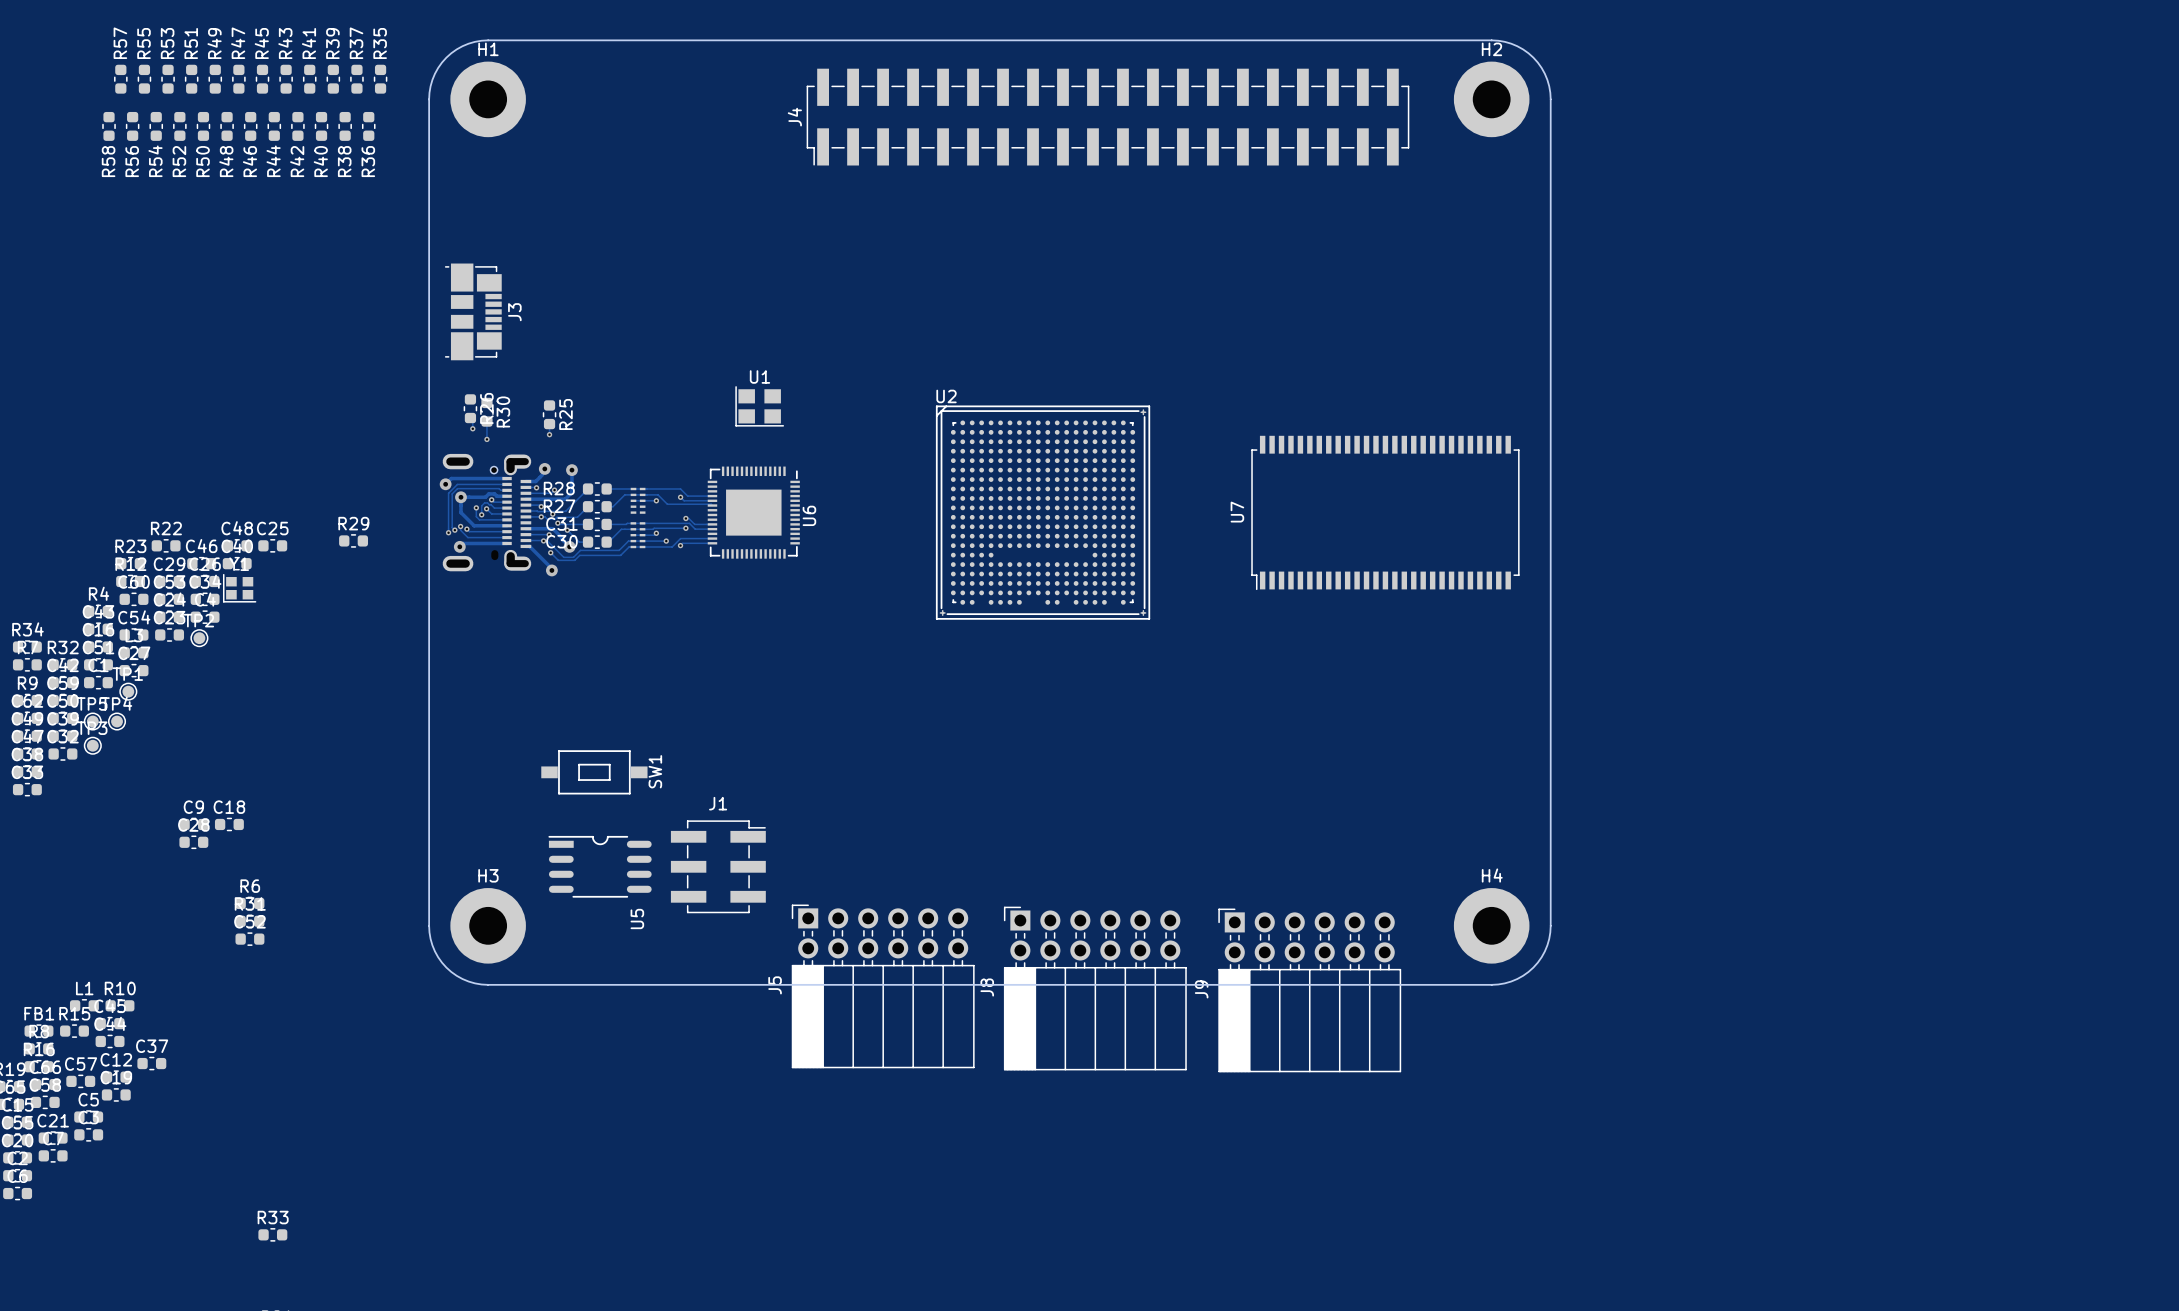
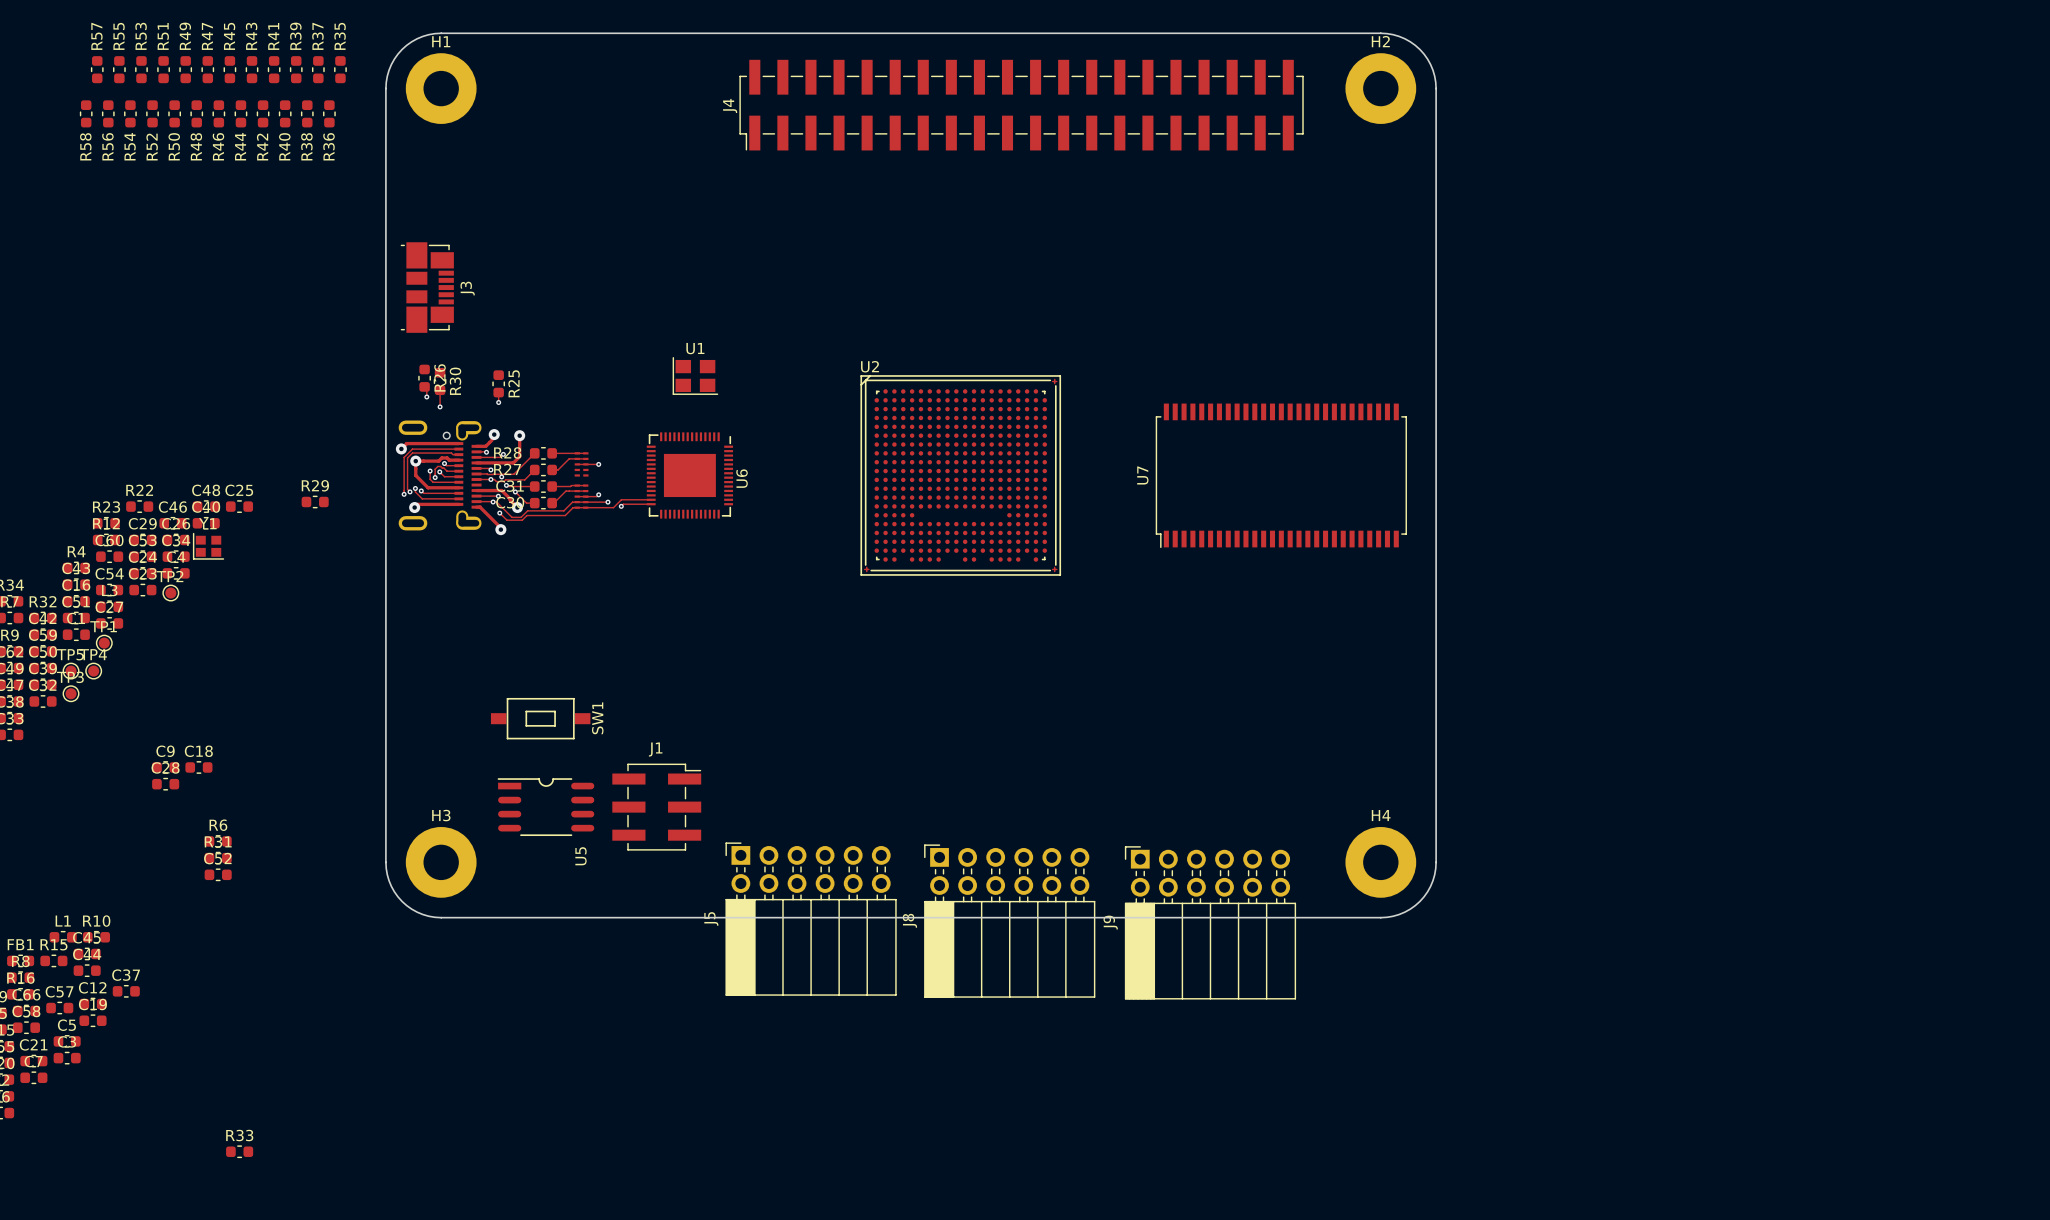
track: (642, 488) (680, 488) (687, 496) (712, 496) -> none
track: (642, 494) (658, 494) (667, 504) (712, 505) -> none
track: (680, 497) (684, 500) (712, 500) -> none
via: (680, 497) -> none
track: (685, 518) (688, 518) (694, 524) (712, 524) -> none
via: (685, 518) -> none
track: (642, 523) (689, 523) (695, 529) (712, 529) -> none
track: (685, 528) (642, 529) -> none
via: (685, 528) -> none

